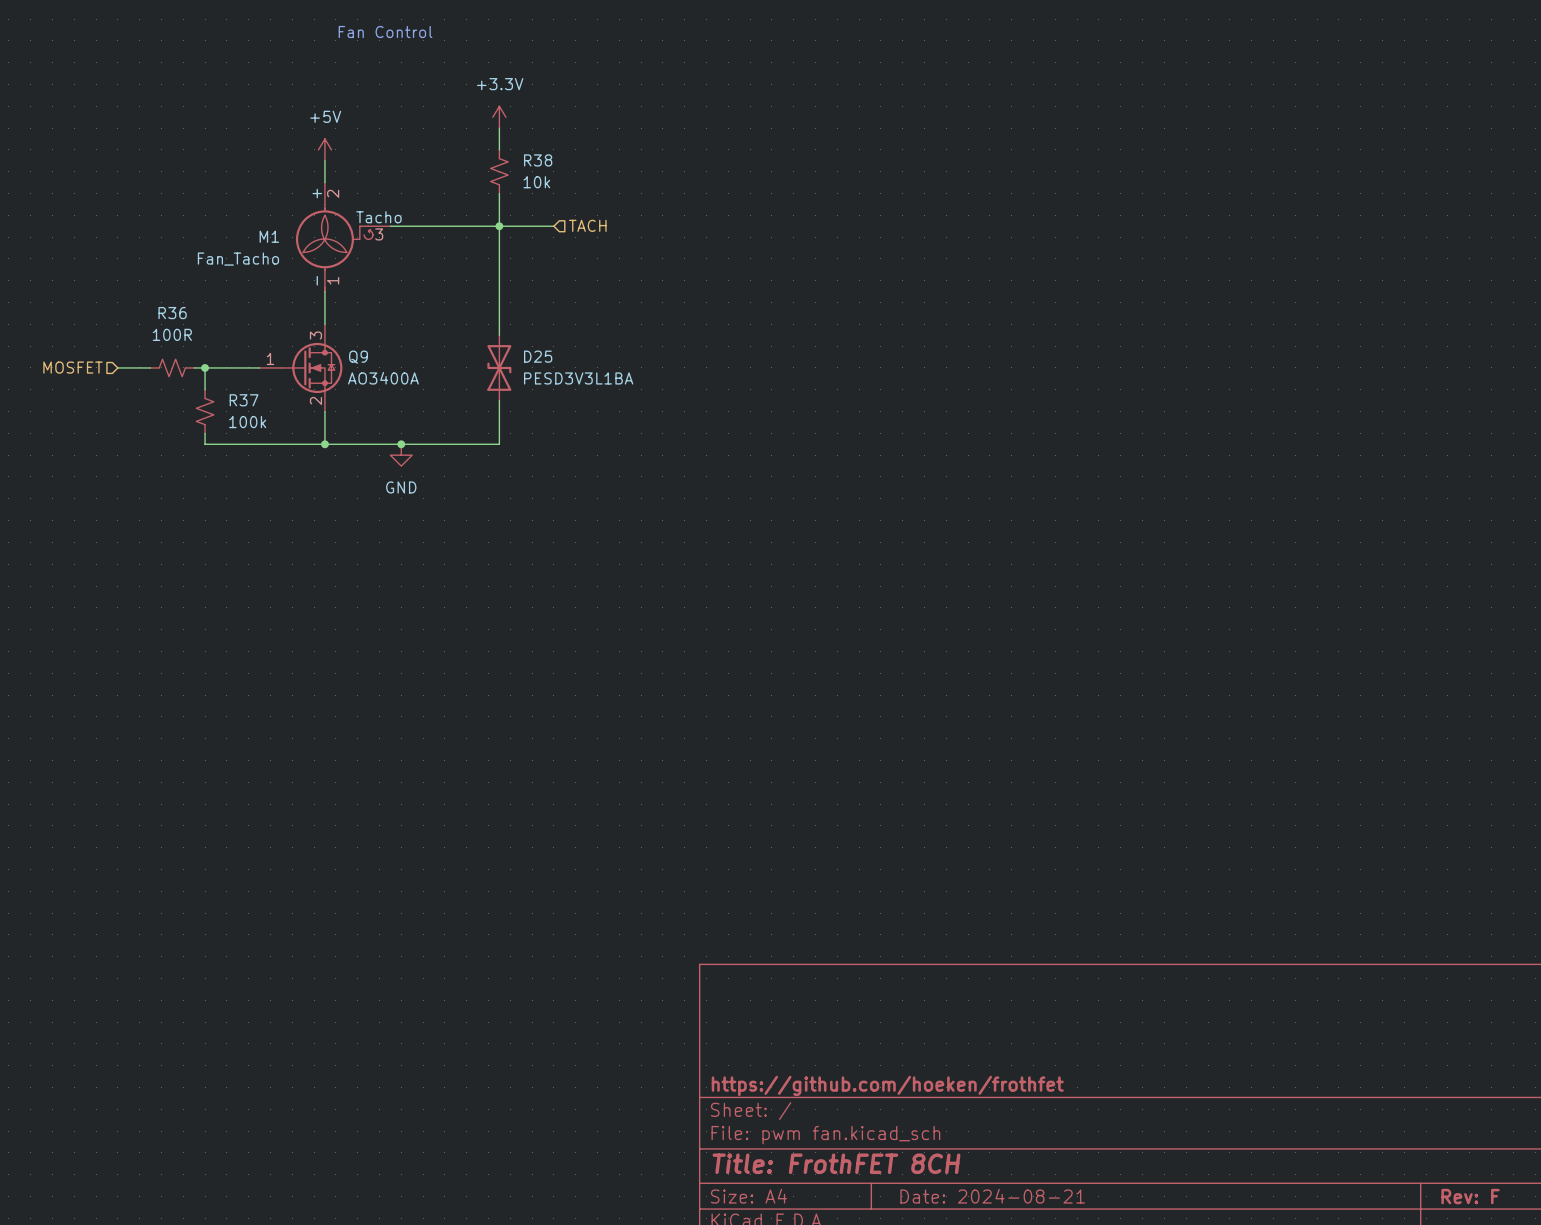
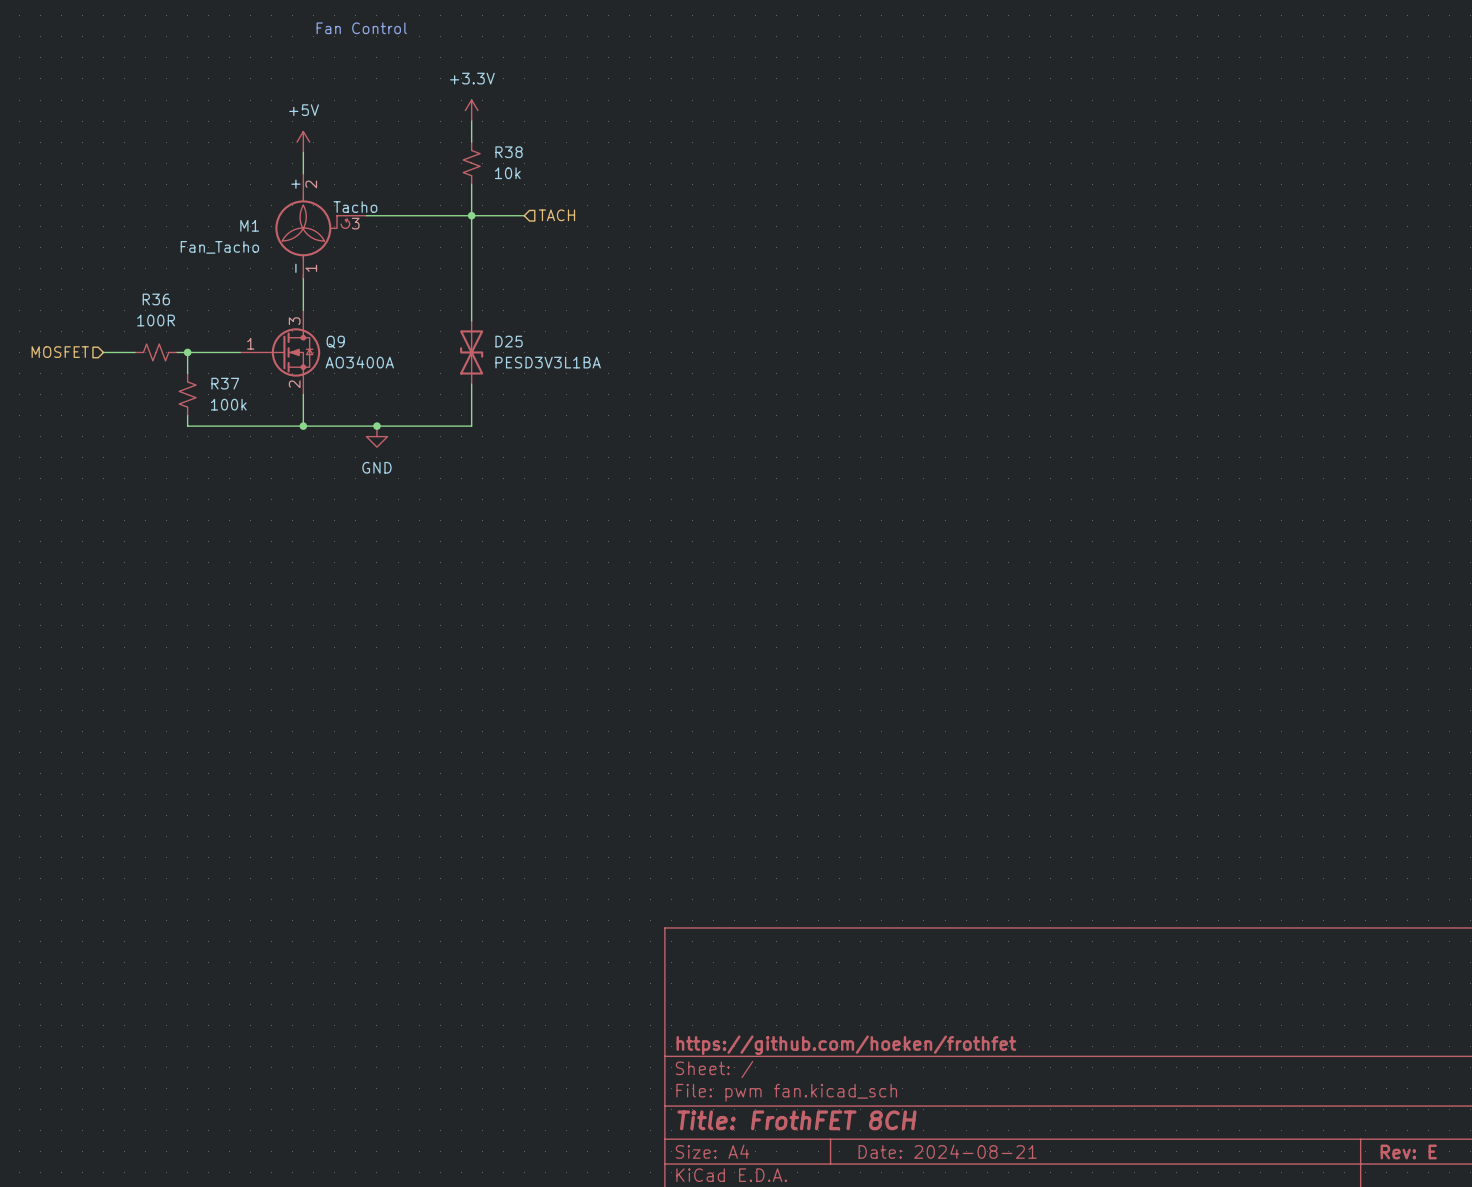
title block: Rev: F (1470, 1196) -> Rev: E (1408, 1151)

